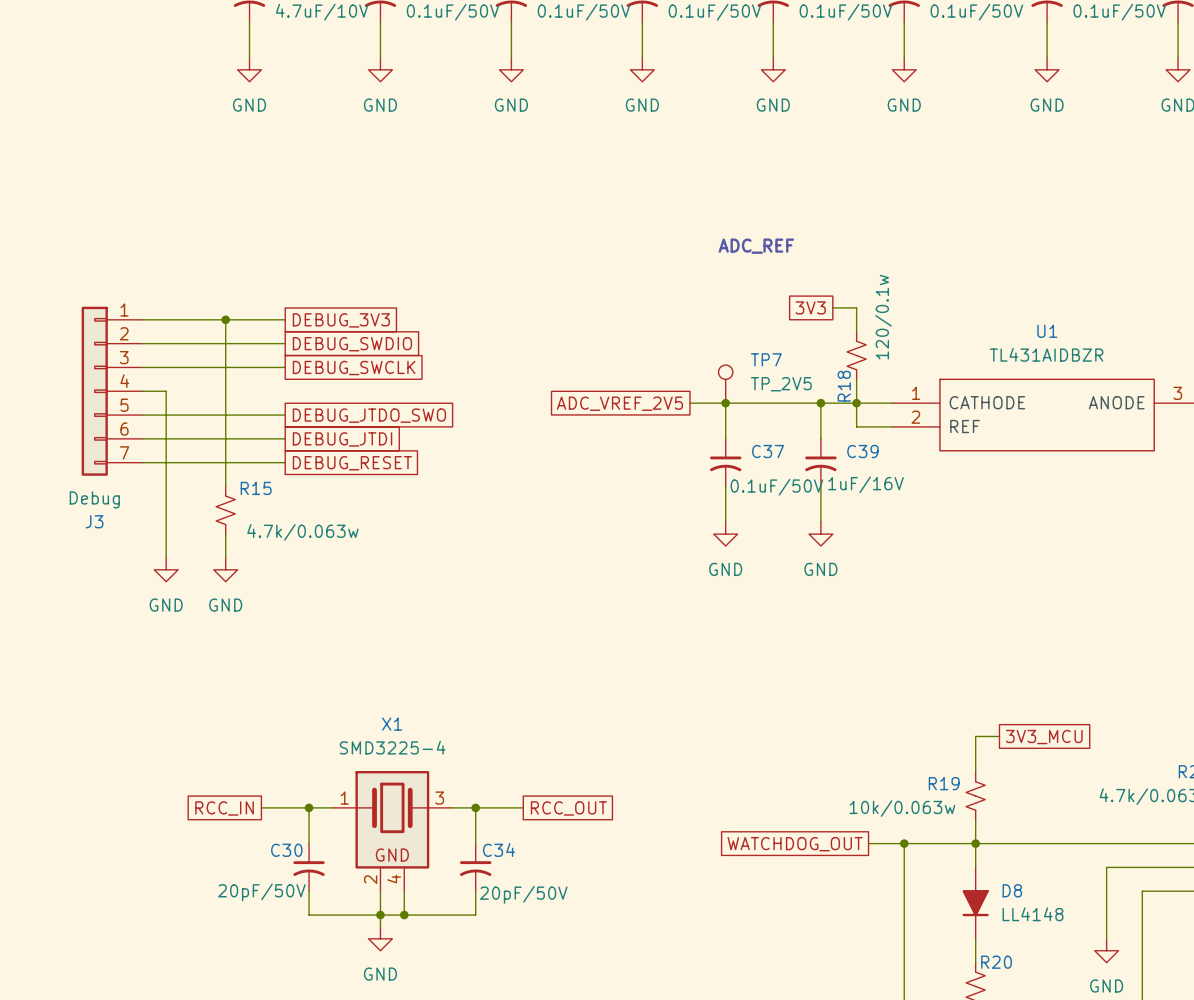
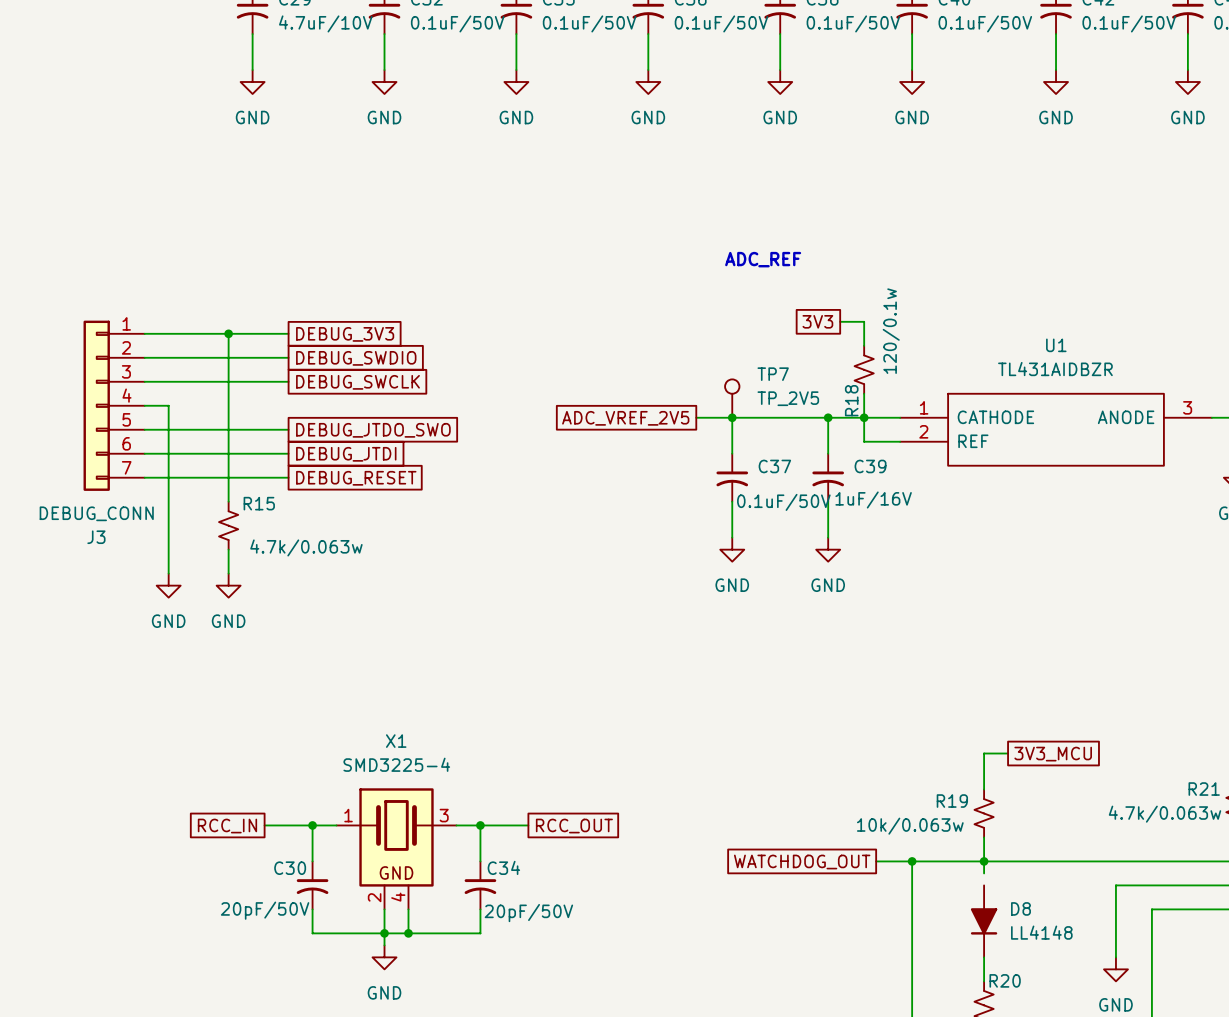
J3 value: Debug (94, 499) -> DEBUG_CONN (96, 513)
wire: (975, 855) (975, 867) -> none

